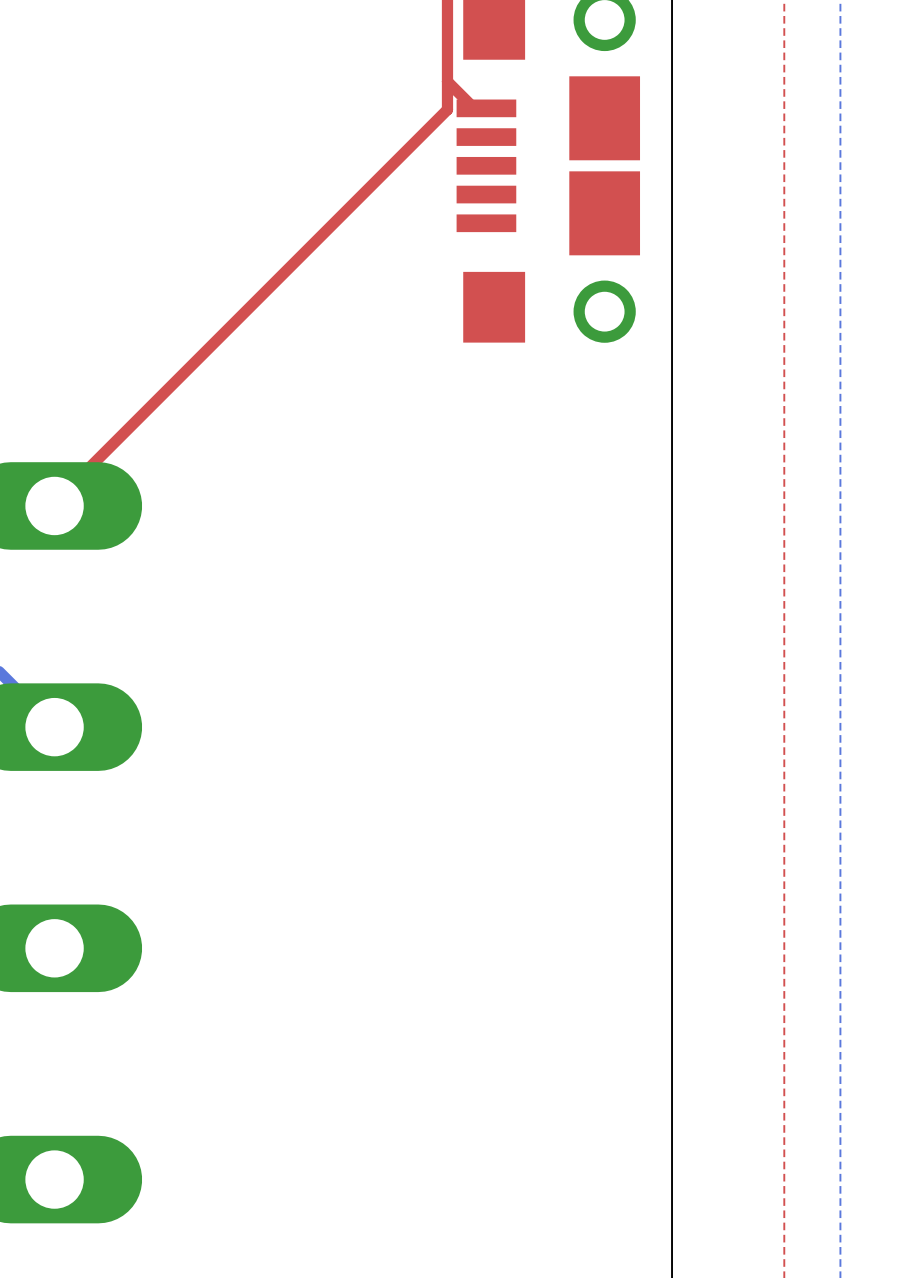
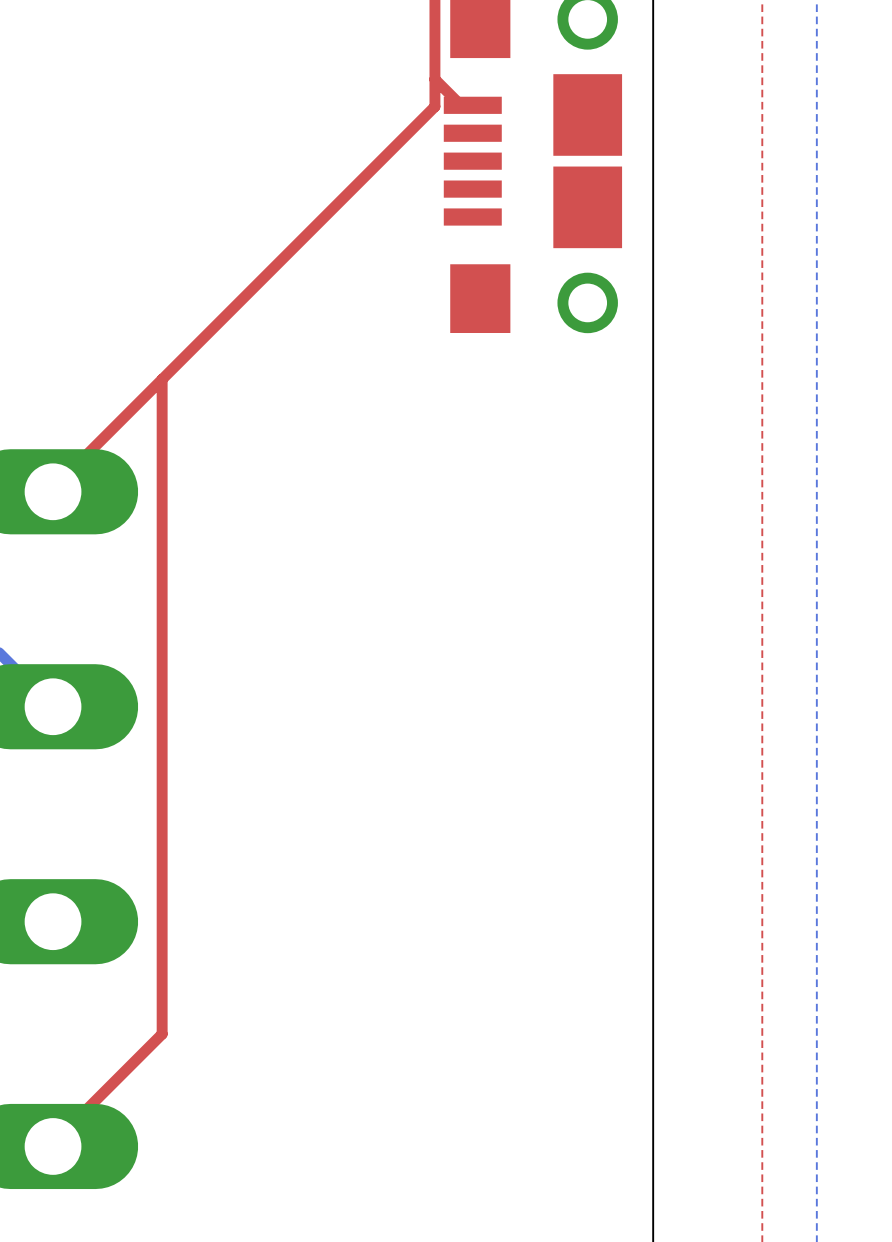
top track: none -> (162, 379) (162, 1034) (53, 1143) (53, 1146)

